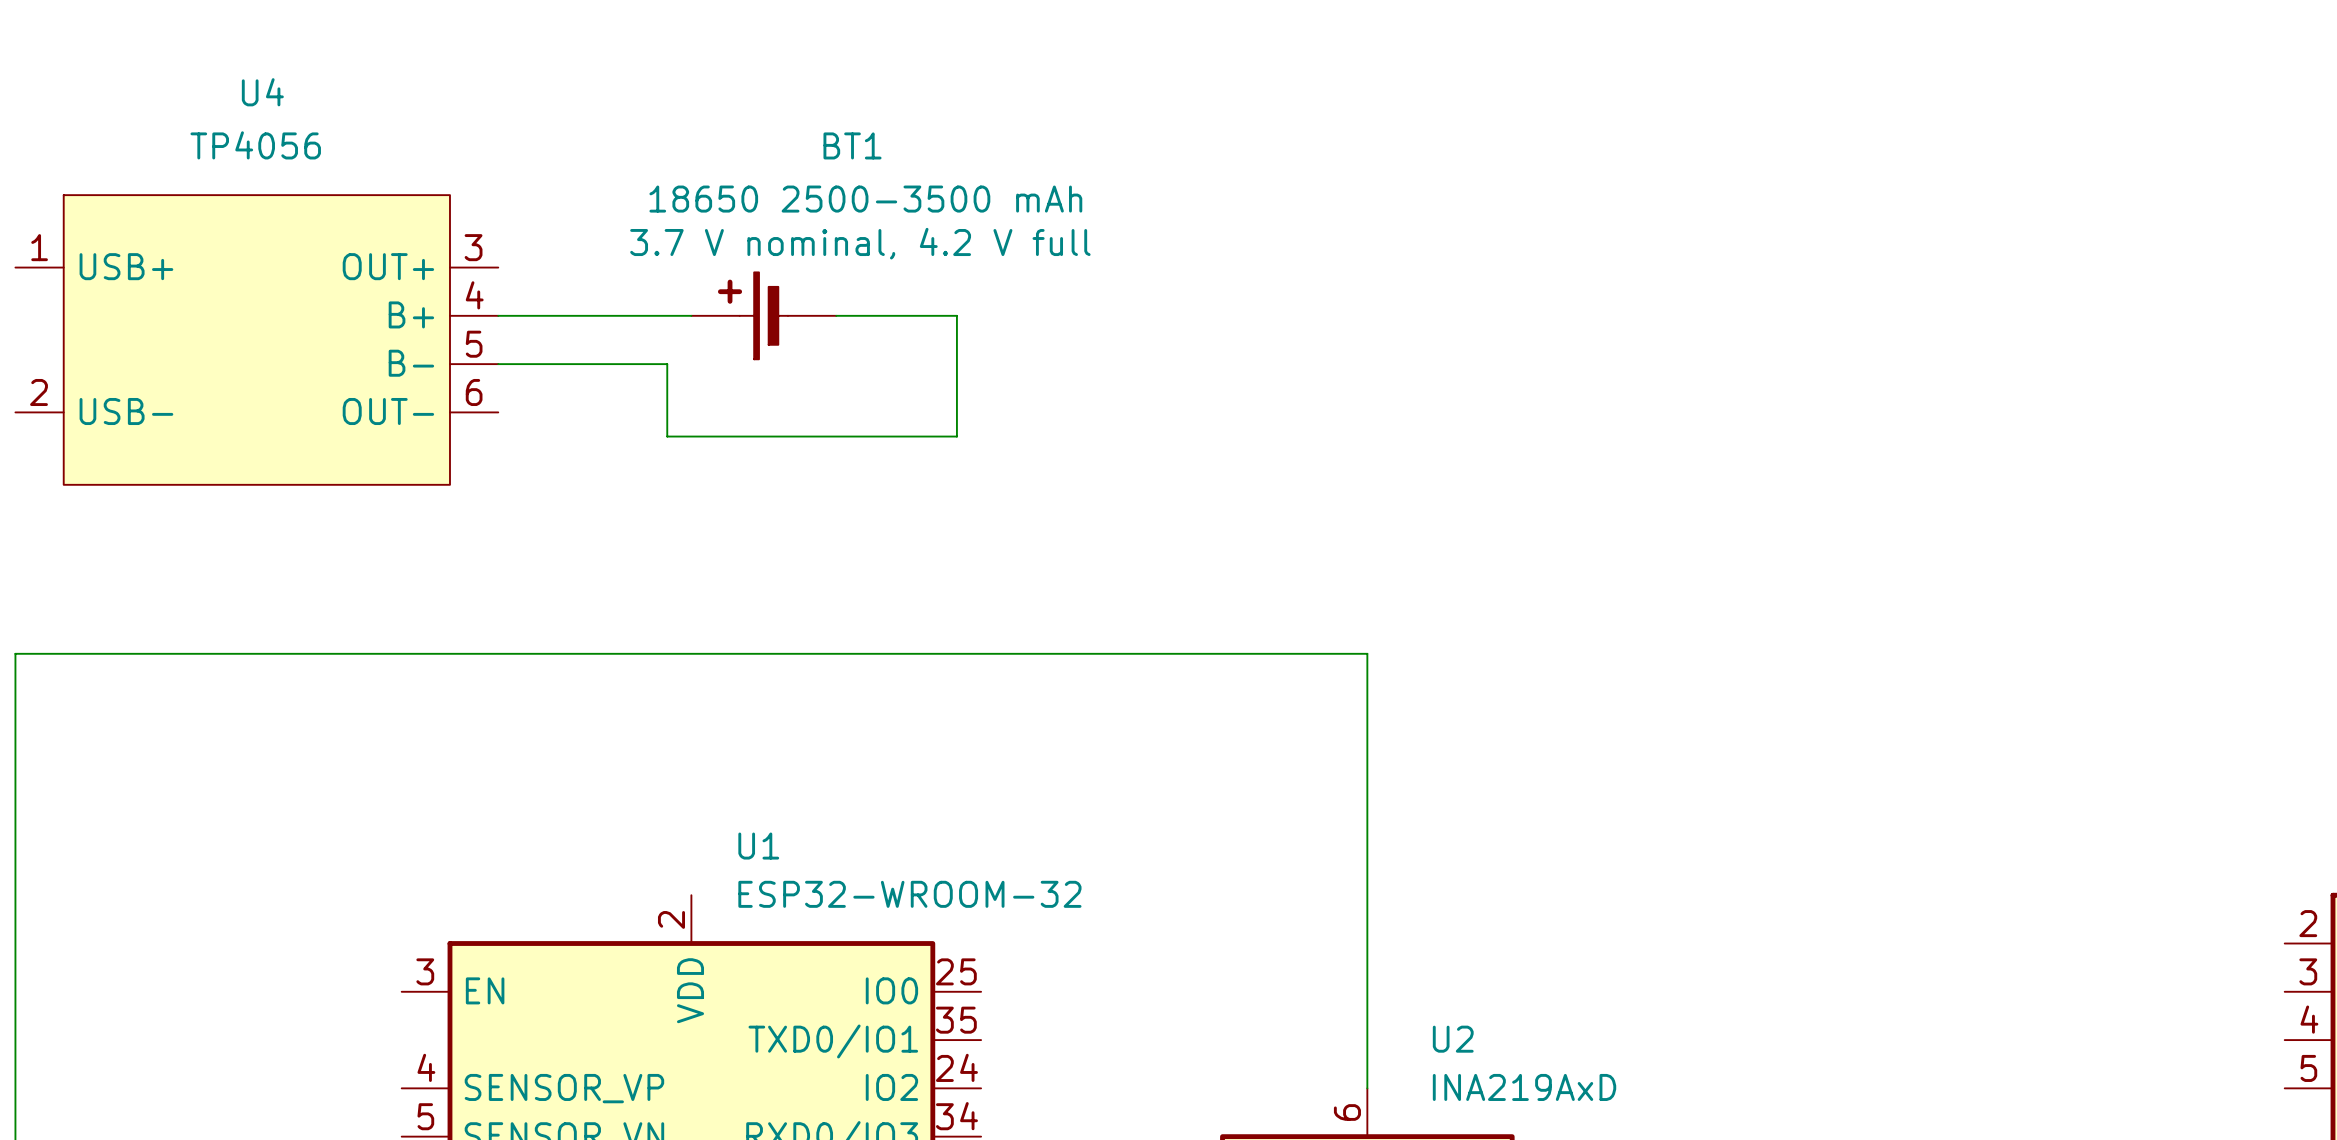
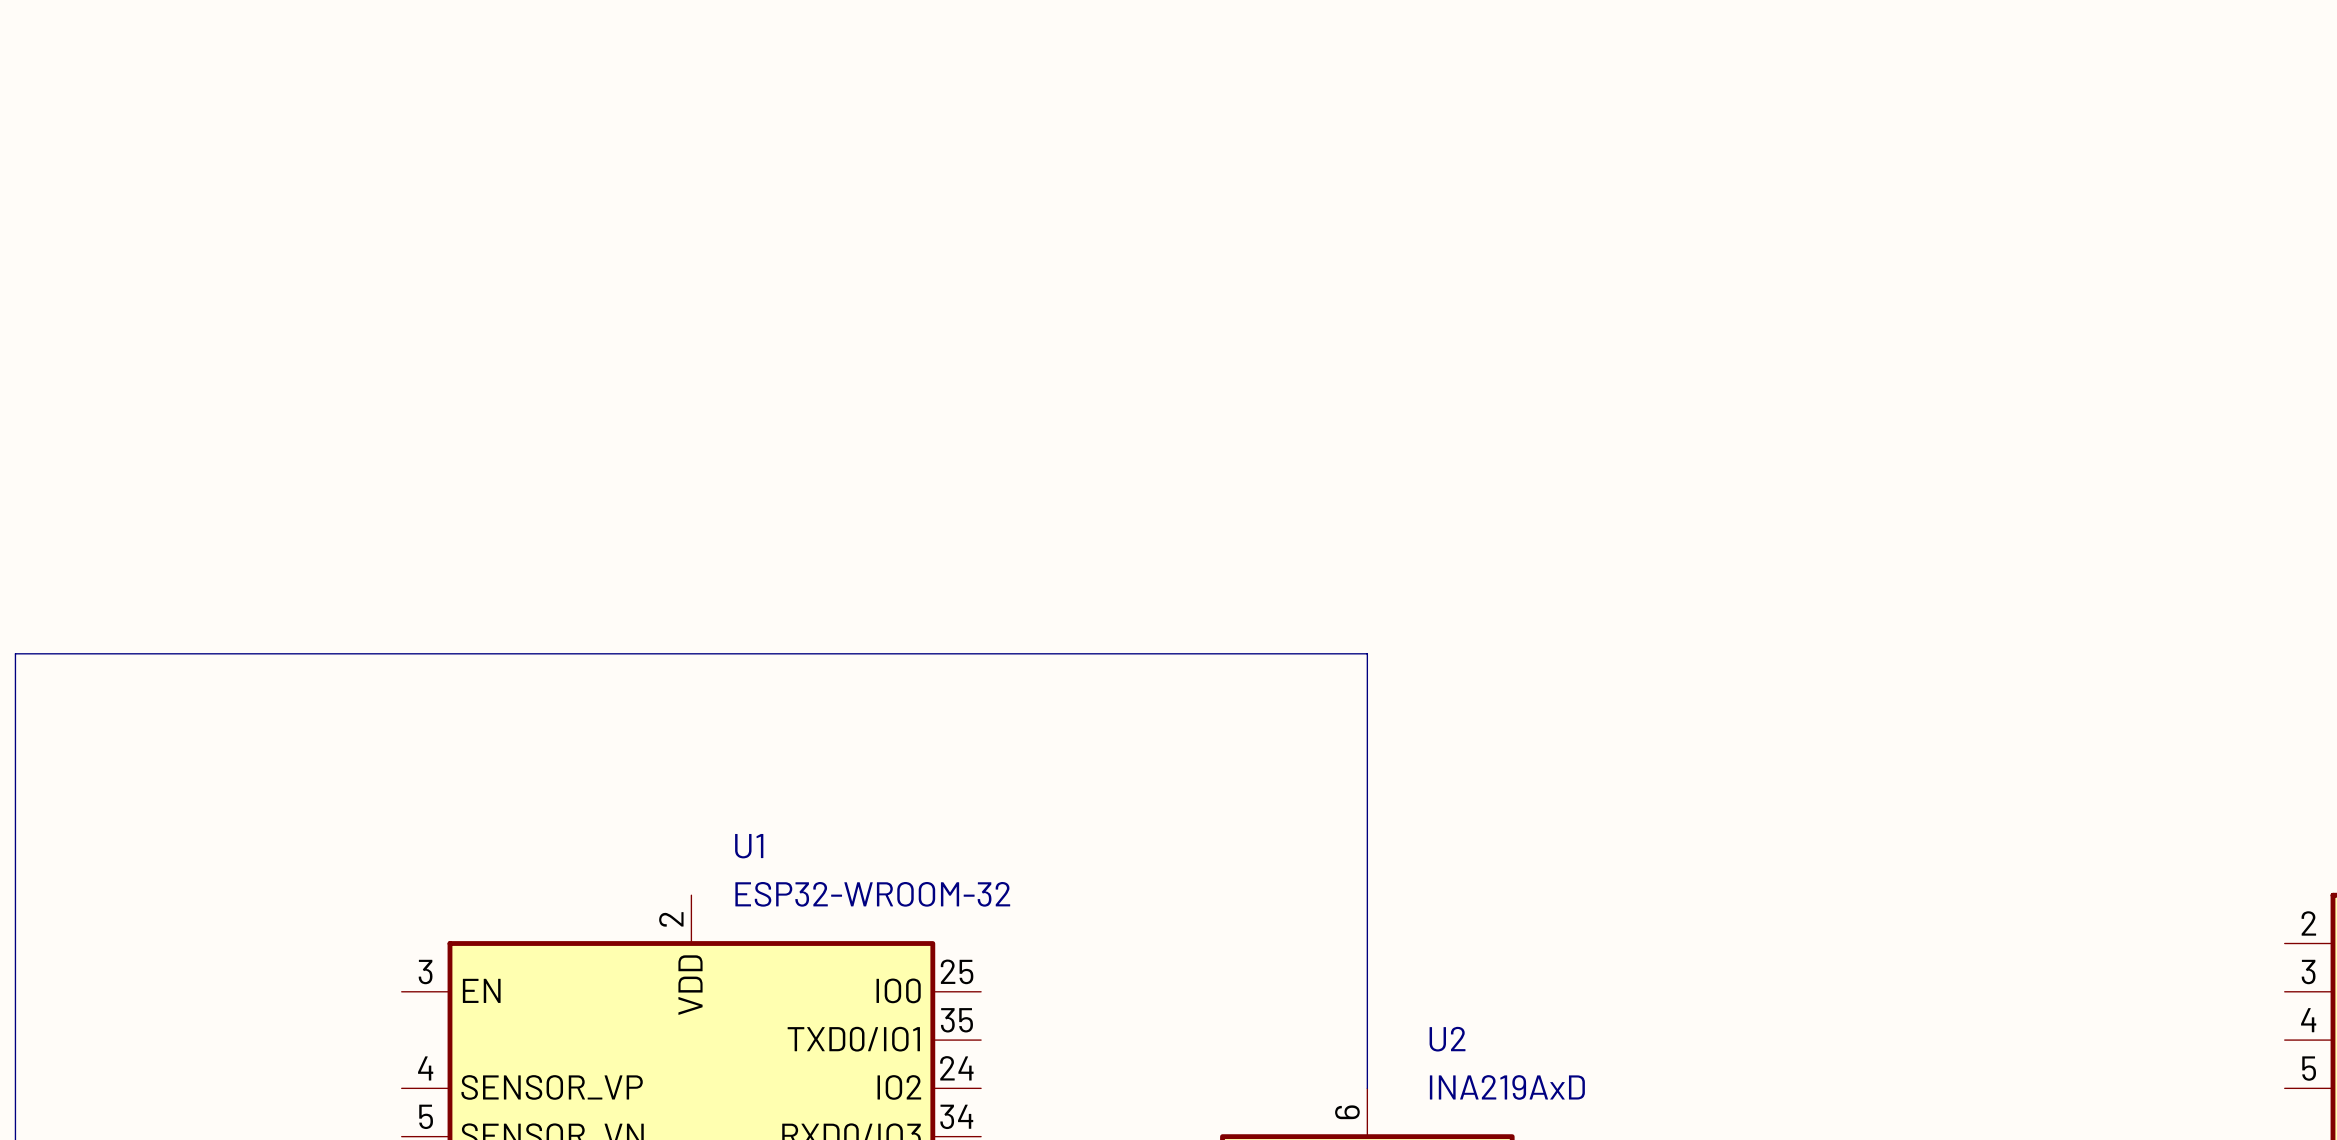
wire: (498, 315) (691, 315) -> none
BT1: 18650 2500-3500 mAh (763, 315) -> none
wire: (836, 315) (956, 315) (956, 436) (667, 436) (667, 364) (498, 364) -> none
U4: (256, 339) -> none

